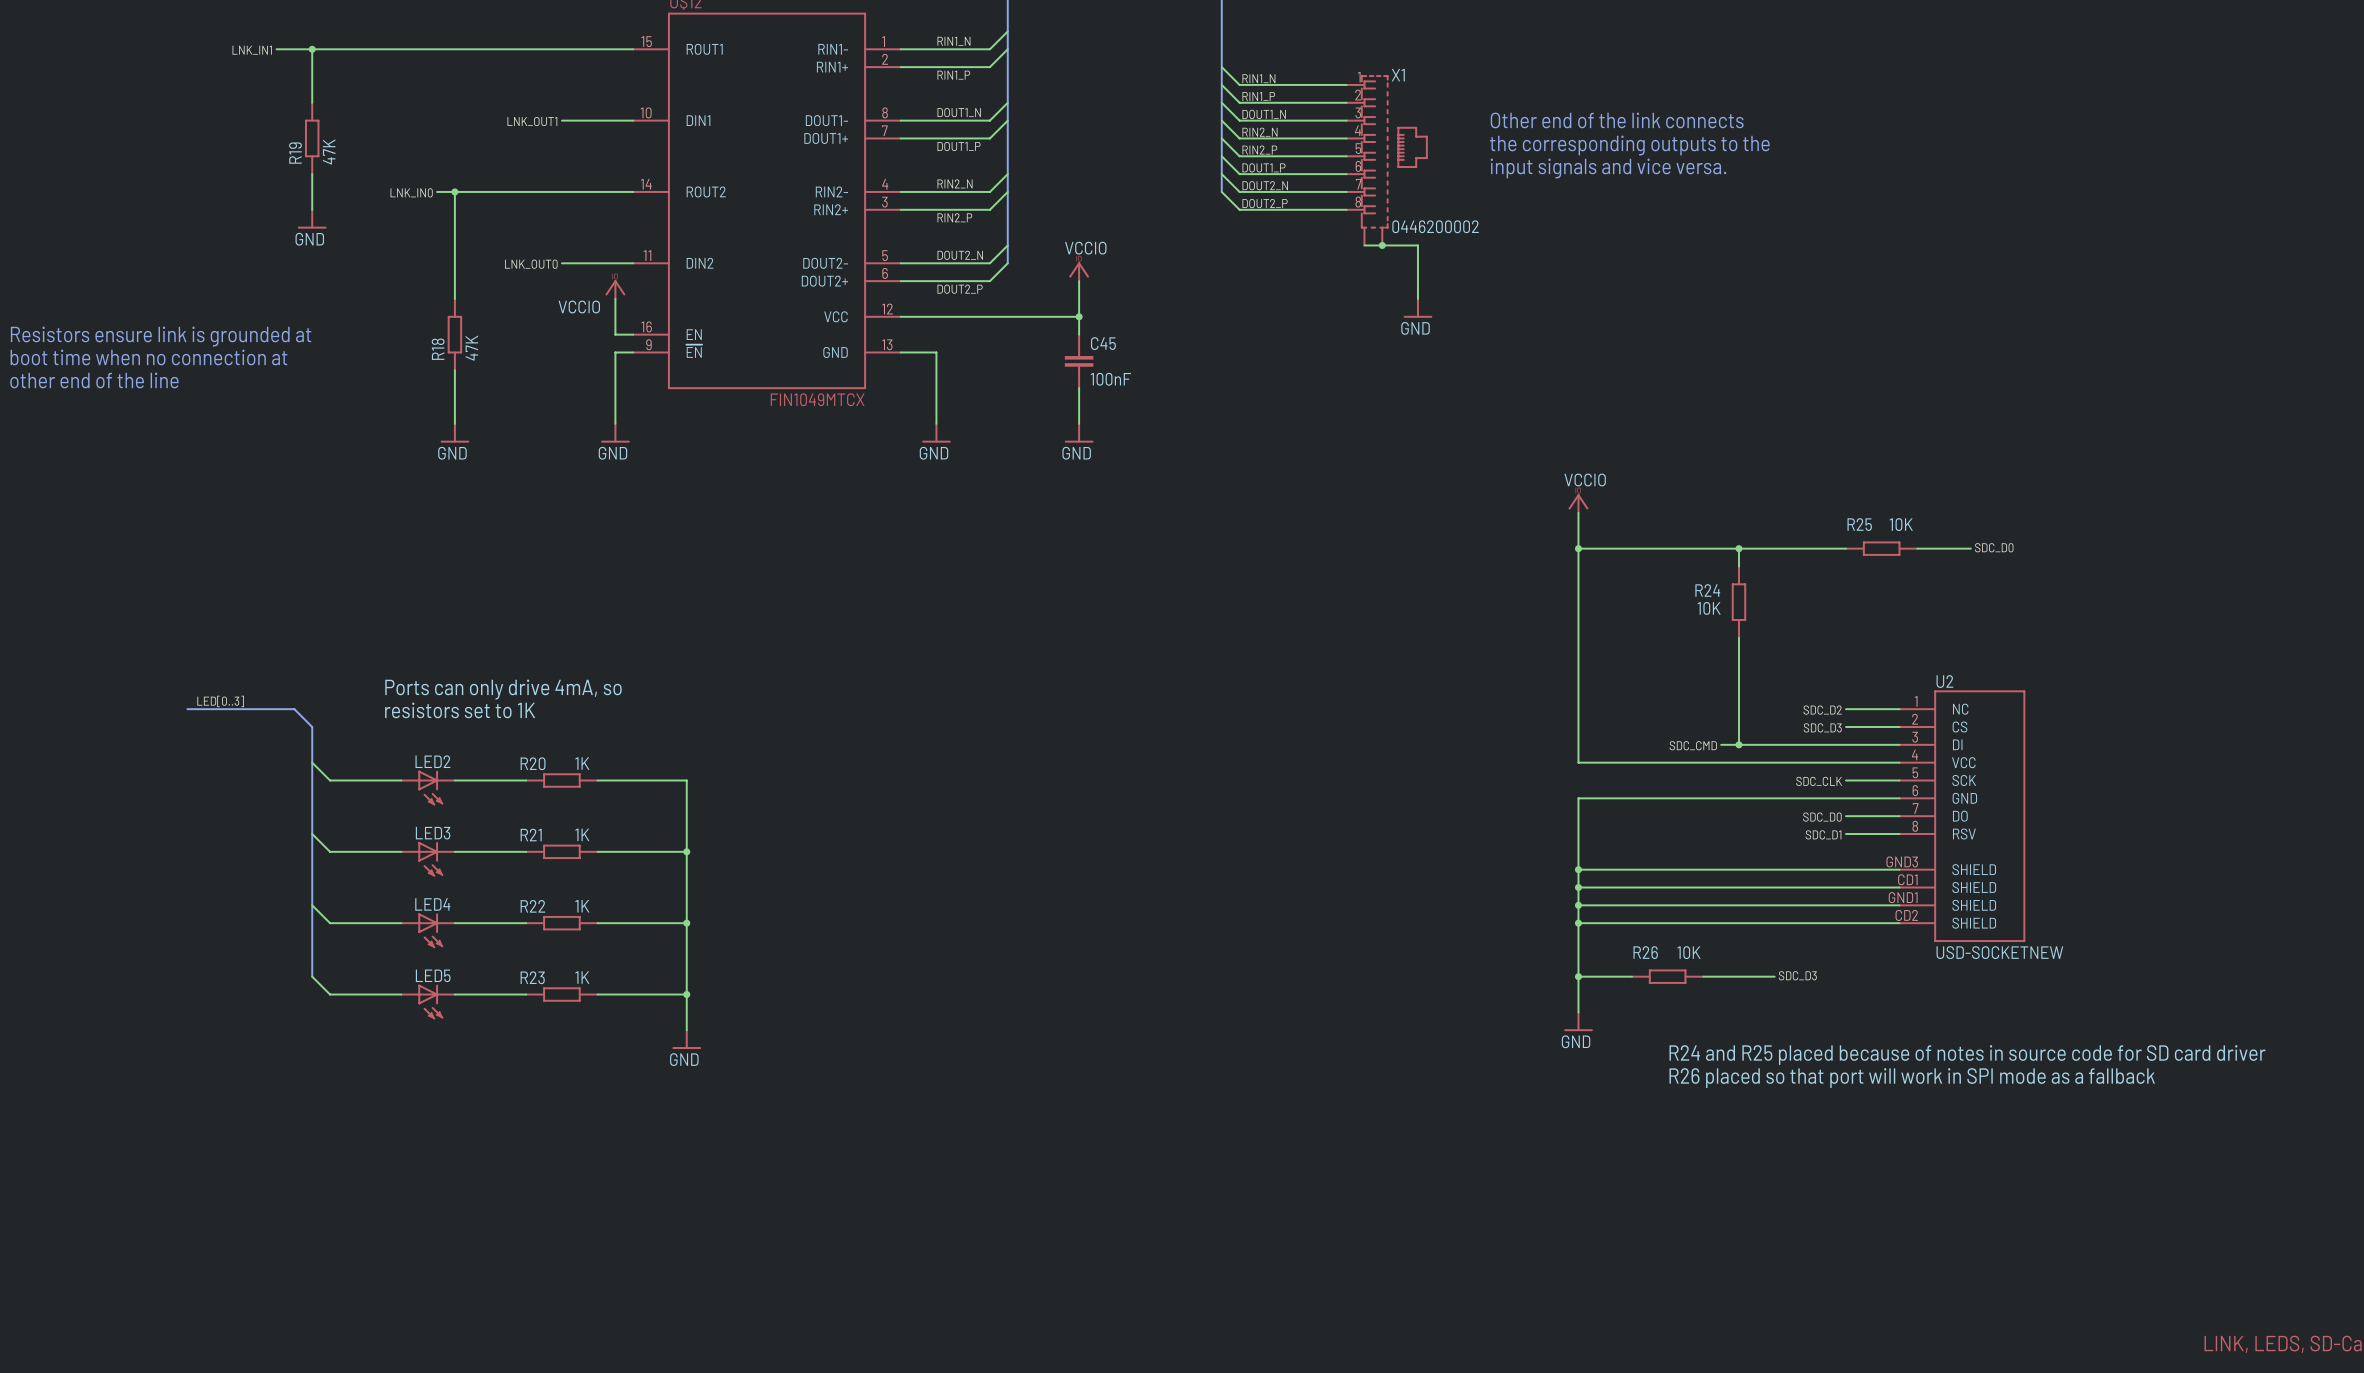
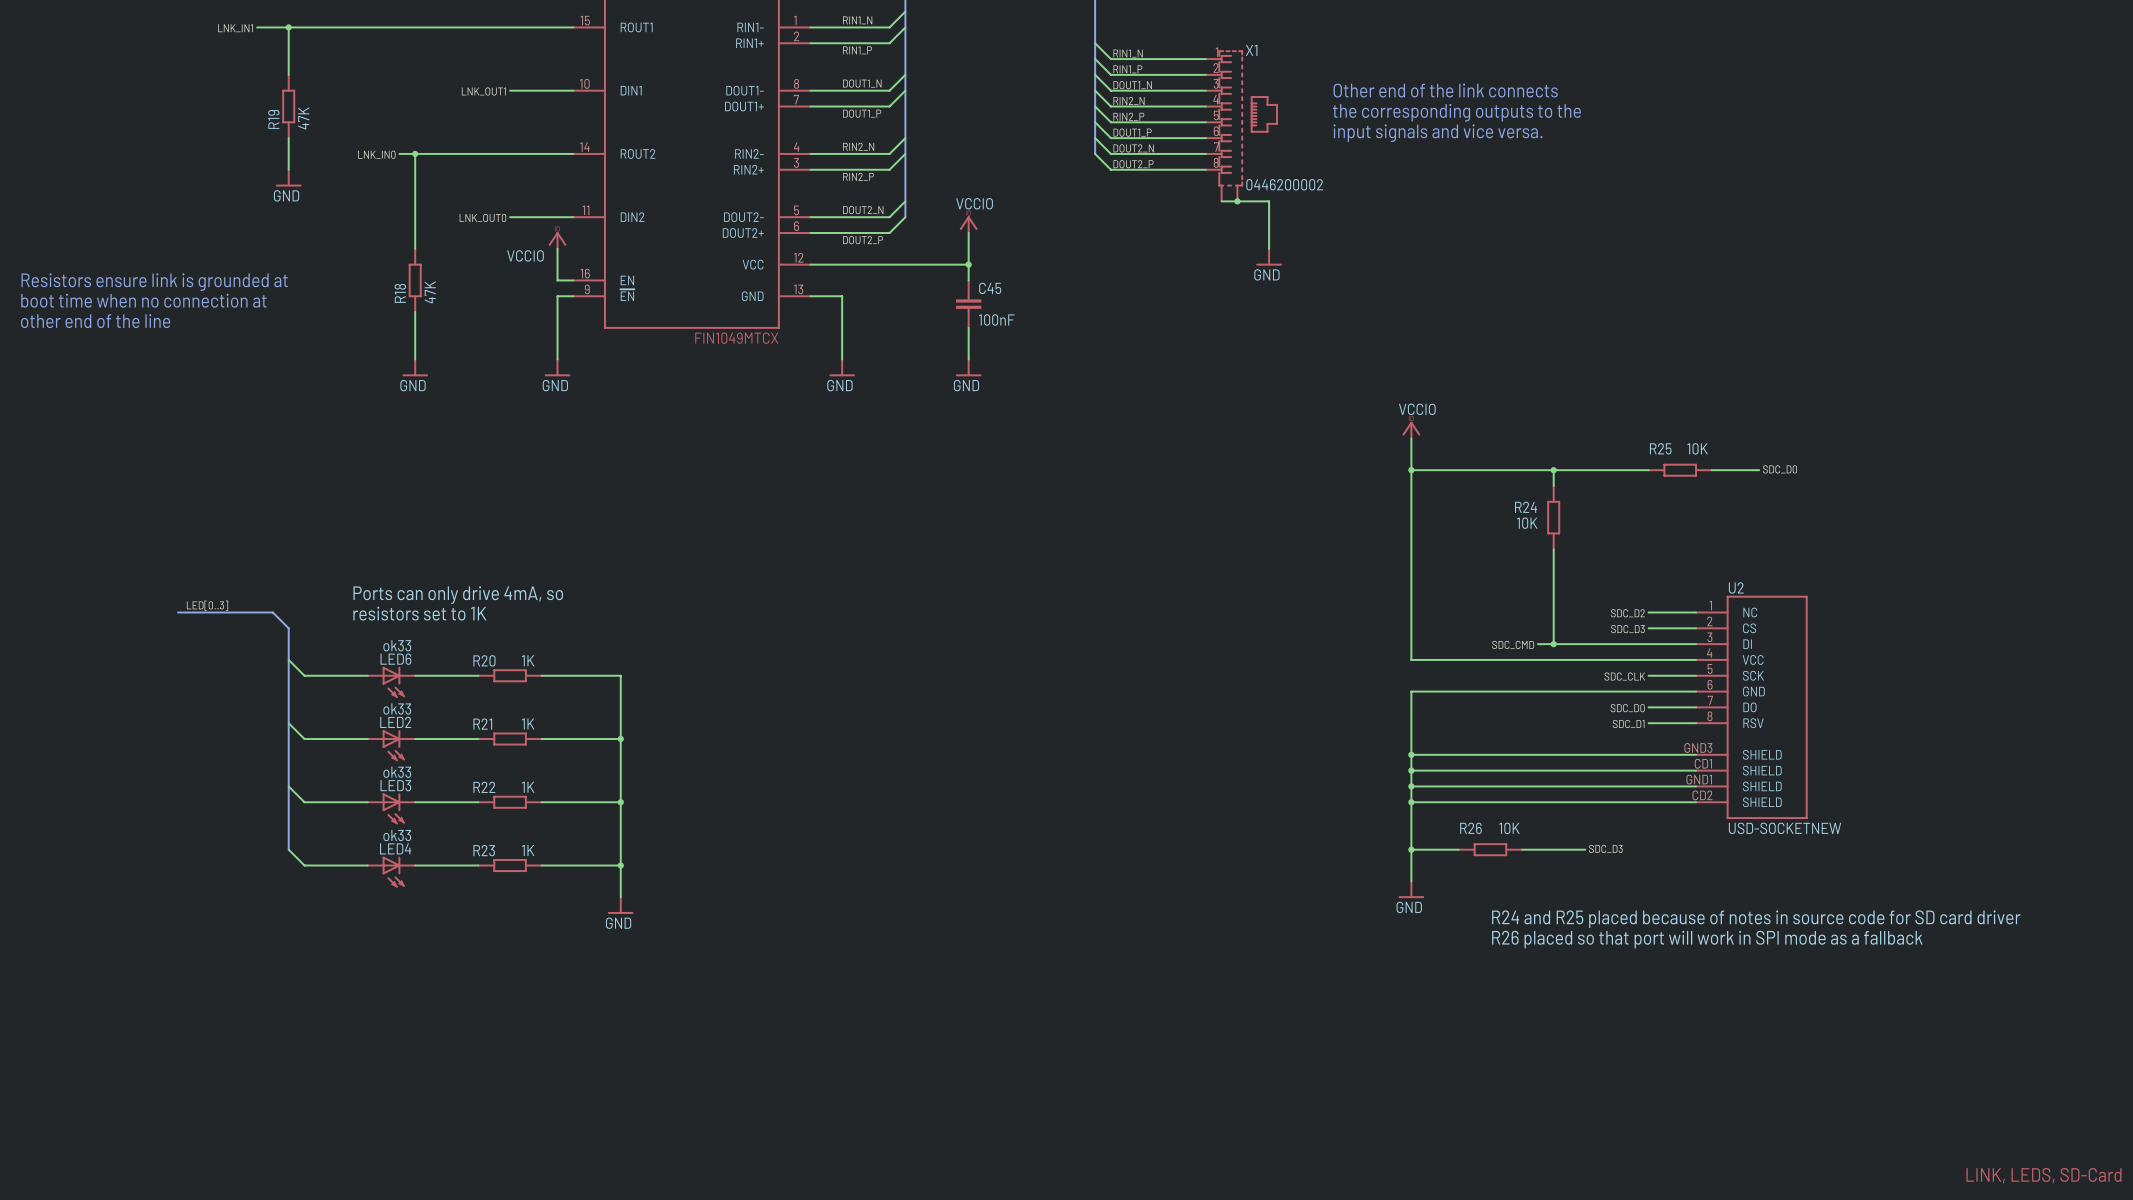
LED2 value: none -> ok33 (397, 645)
LED2 name: LED2 (432, 761) -> LED6 (395, 659)
LED3 value: none -> ok33 (397, 709)
LED3 name: LED3 (433, 833) -> LED2 (395, 722)
LED4 value: none -> ok33 (397, 772)
LED4 name: LED4 (432, 904) -> LED3 (395, 785)
LED5 value: none -> ok33 (397, 835)
LED5 name: LED5 (433, 975) -> LED4 (395, 848)

